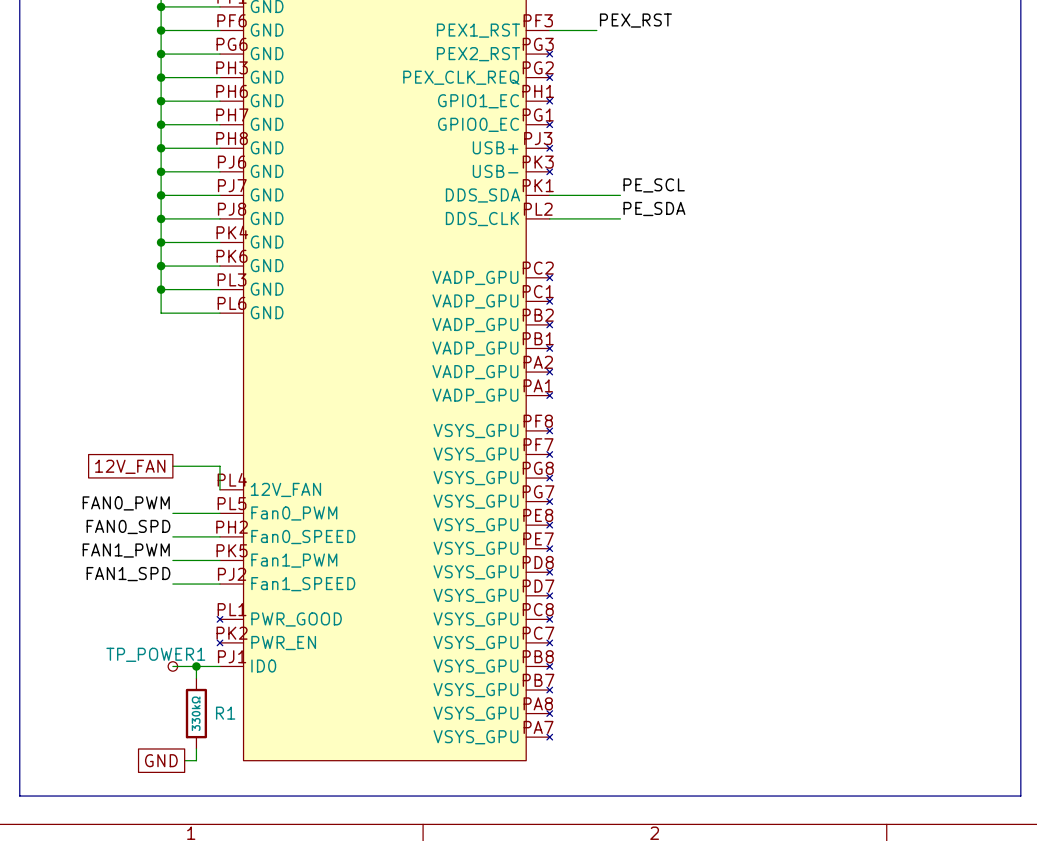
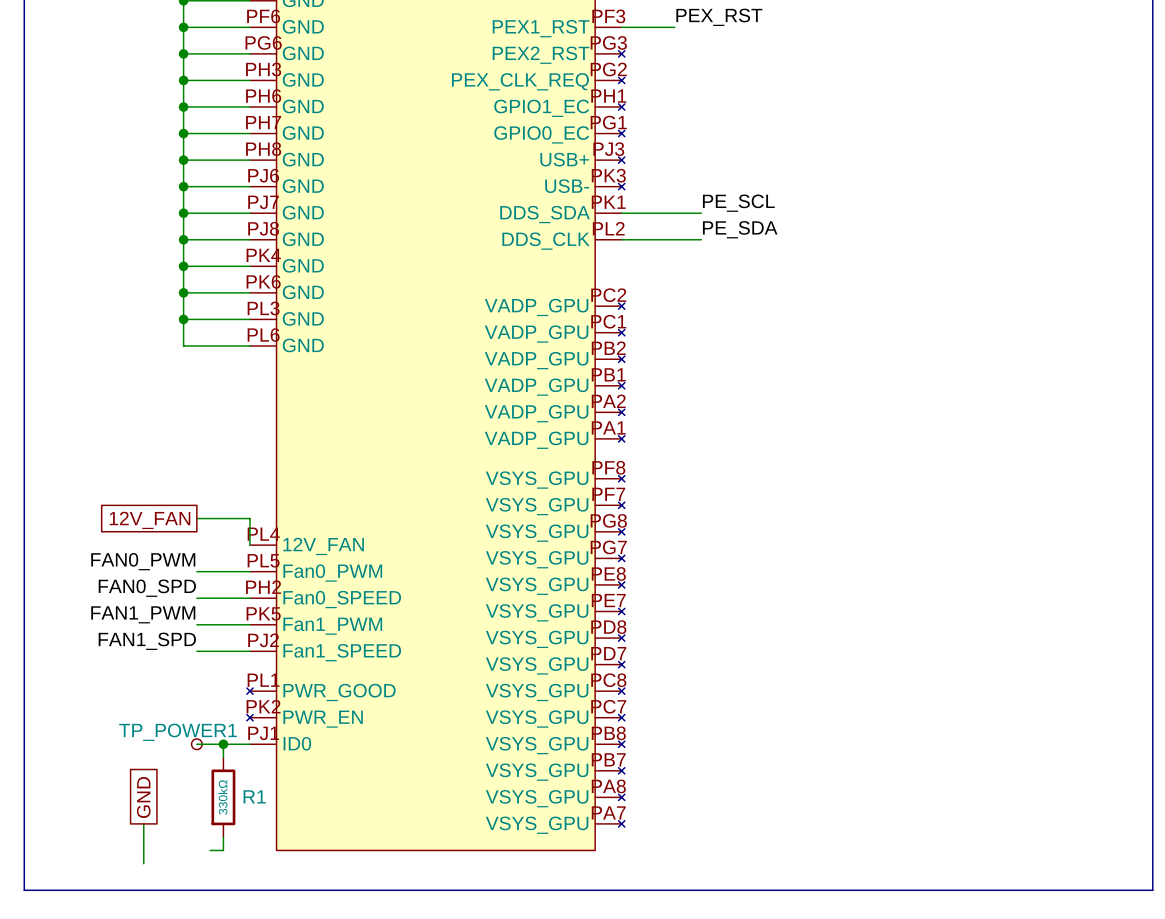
wire: none -> (143, 823) (143, 863)
global label rotation: 0° (161, 760) -> 90° clockwise (143, 797)

